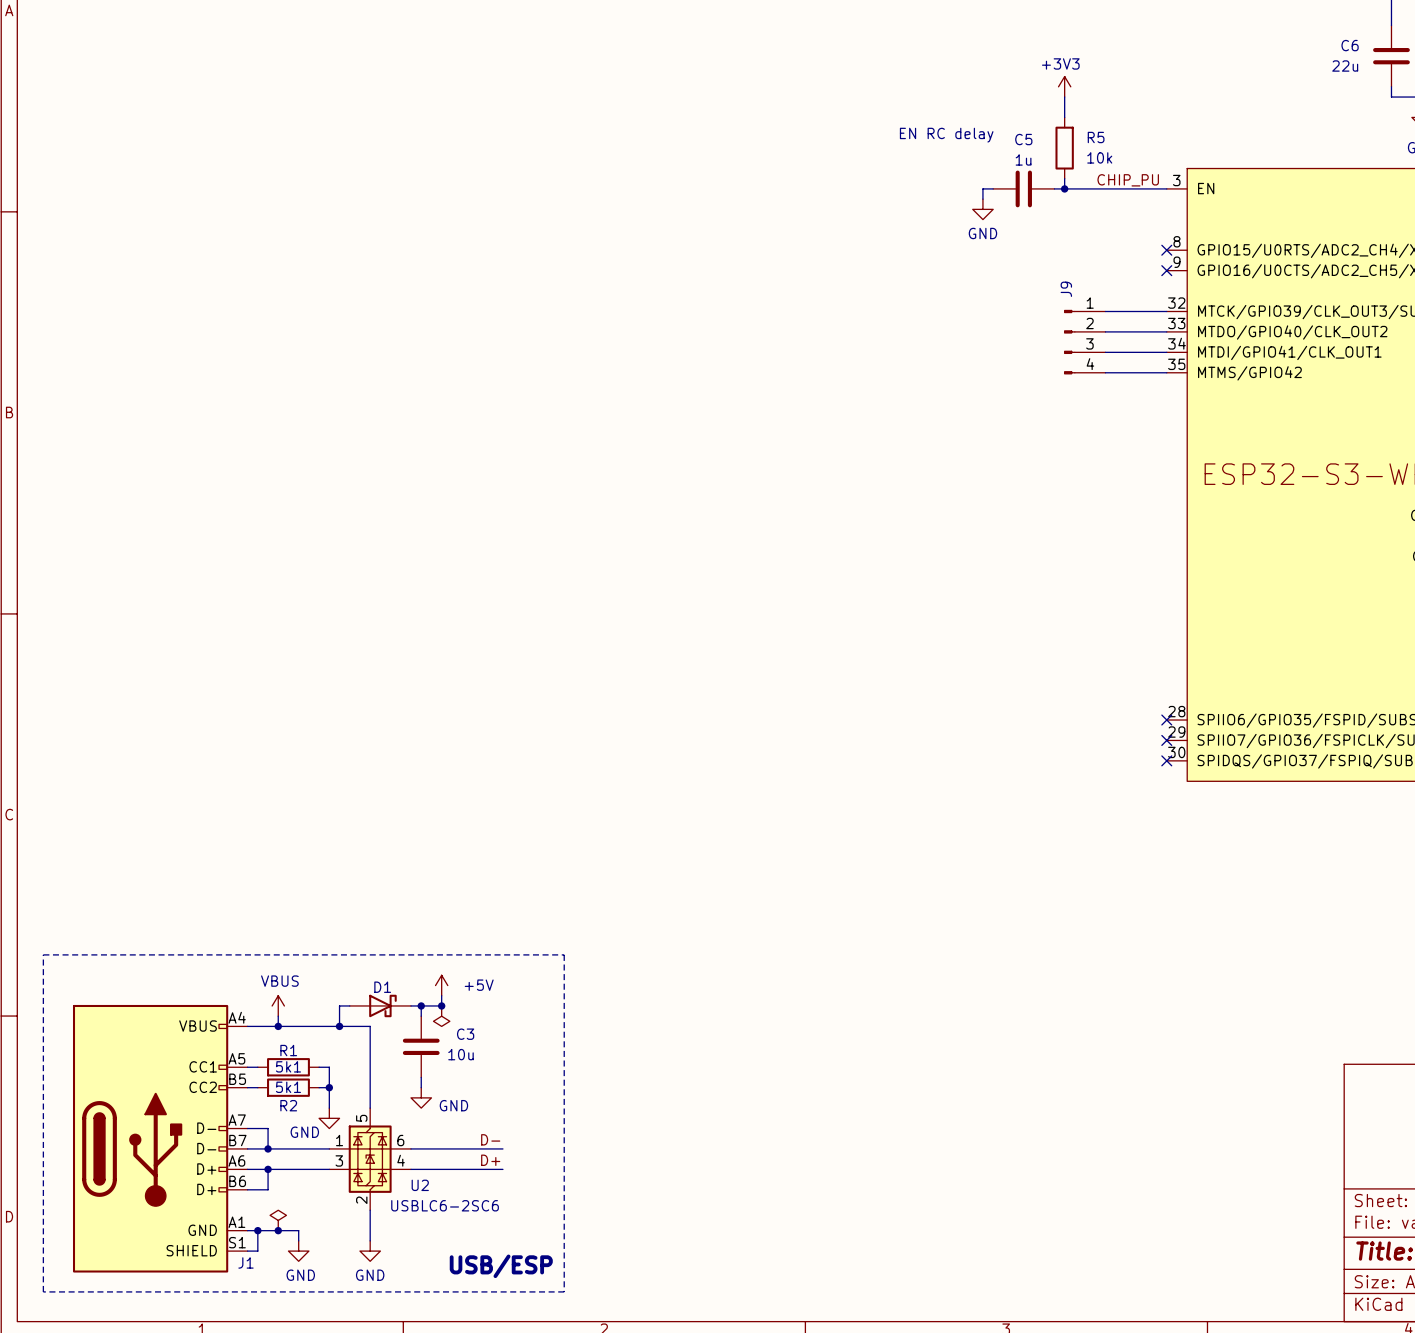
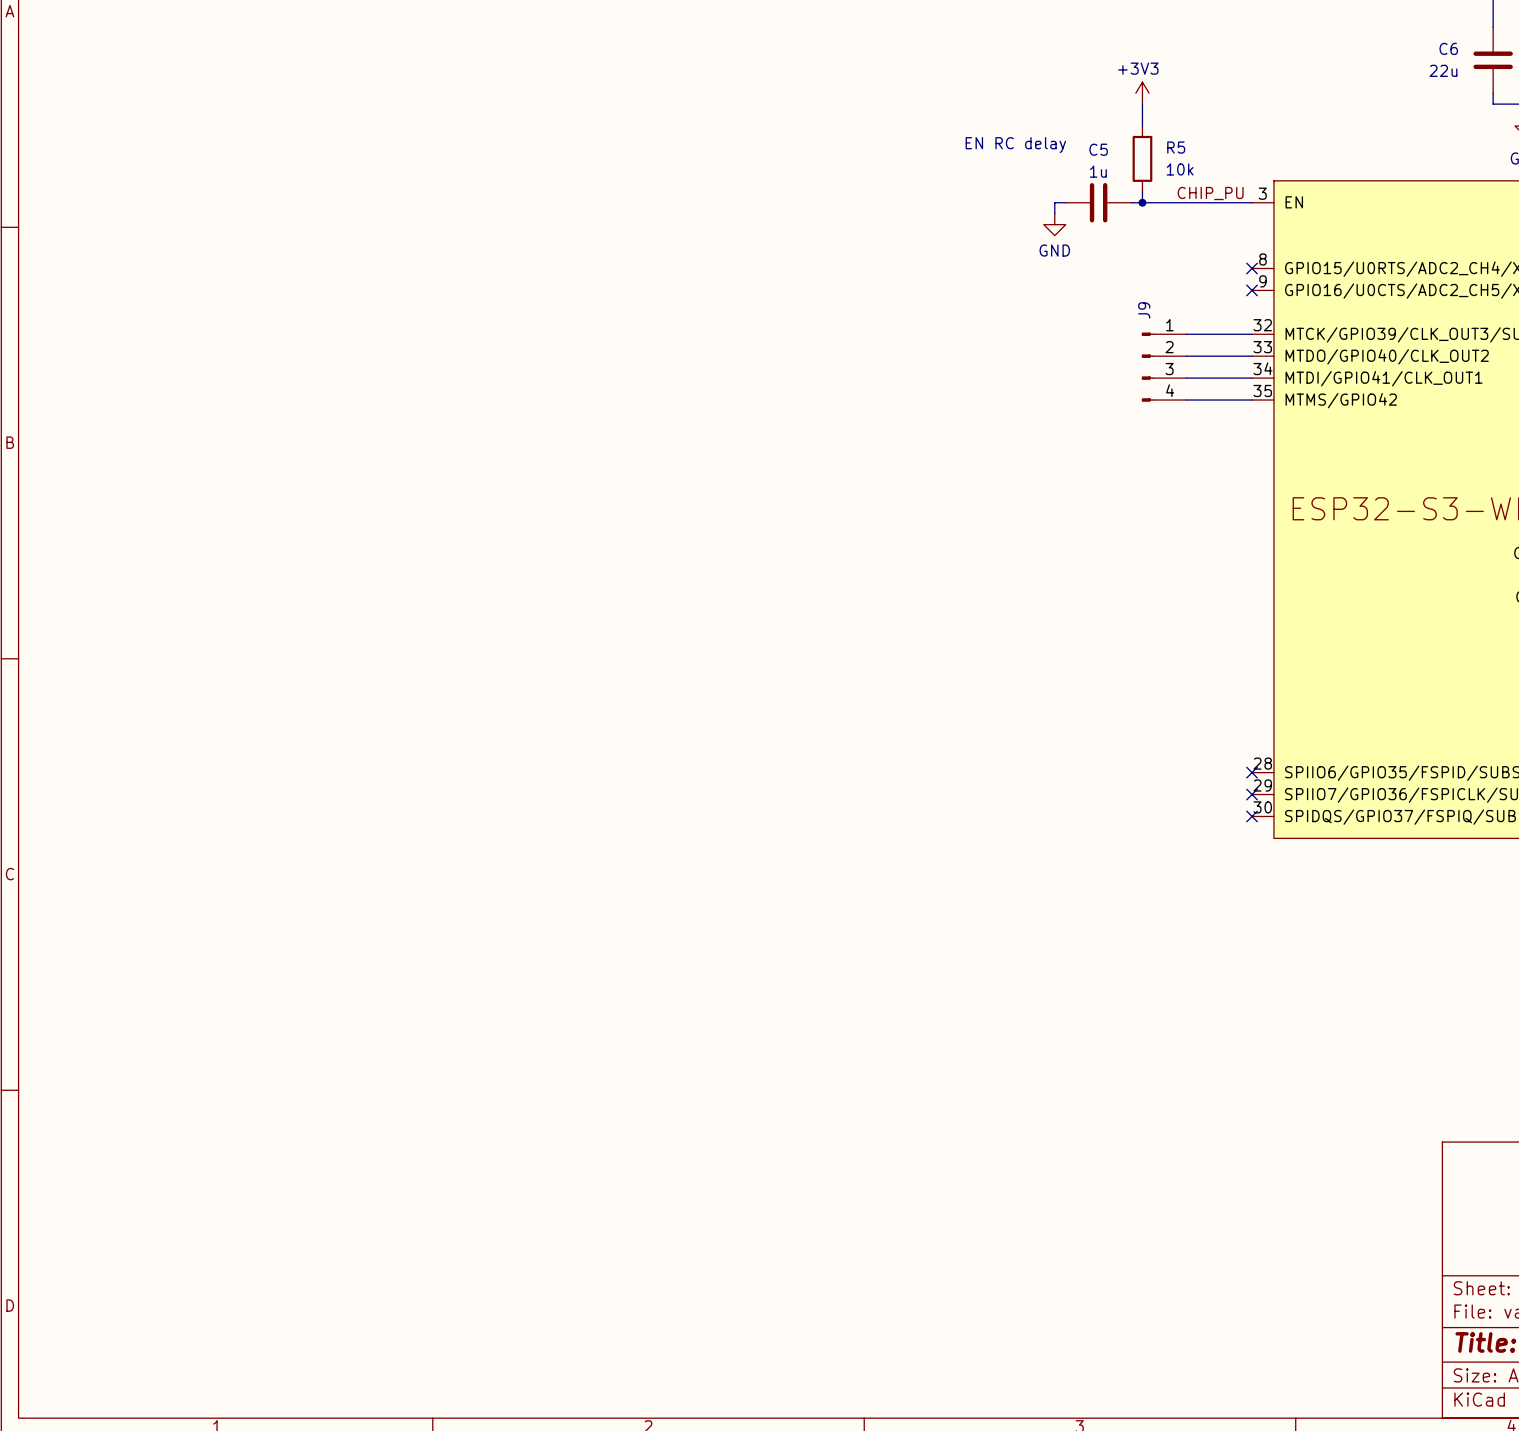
line: (43, 954) (564, 954) (564, 1291) (43, 1291) (43, 954) -> none
power symbol: +5V (441, 985) -> none
wire: (441, 995) (441, 1005) (411, 1005) -> none
power symbol: VBUS (278, 1005) -> none
wire: (349, 1005) (339, 1005) (339, 1026) -> none
D1: (380, 1005) -> none
wire: (421, 1005) (421, 1016) -> none
junction: (421, 1005) -> none
junction: (441, 1005) -> none
wire: (278, 1016) (278, 1026) -> none
power symbol: (441, 1016) -> none
wire: (247, 1026) (370, 1026) (370, 1108) -> none
junction: (278, 1026) -> none
junction: (339, 1026) -> none
C3: 10u (421, 1046) -> none
wire: (247, 1067) (257, 1067) -> none
R1: 5k1 (288, 1067) -> none
wire: (319, 1067) (329, 1067) (329, 1108) -> none
wire: (421, 1077) (421, 1087) -> none
wire: (247, 1087) (257, 1087) -> none
R2: 5k1 (288, 1087) -> none
wire: (319, 1087) (329, 1087) -> none
junction: (329, 1087) -> none
power symbol: GND (421, 1097) -> none
power symbol: GND (329, 1118) -> none
wire: (247, 1128) (268, 1128) (268, 1148) -> none
J1: (160, 1138) -> none
label: D- (490, 1139) -> none
wire: (247, 1148) (329, 1148) -> none
junction: (268, 1148) -> none
wire: (411, 1148) (502, 1148) -> none
U2: USBLC6-2SC6 (370, 1159) -> none
label: D+ (490, 1160) -> none
wire: (247, 1169) (329, 1169) -> none
wire: (268, 1169) (268, 1189) (247, 1189) -> none
junction: (268, 1169) -> none
wire: (411, 1169) (502, 1169) -> none
wire: (370, 1210) (370, 1240) -> none
power symbol: (278, 1220) -> none
wire: (247, 1230) (298, 1230) (298, 1240) -> none
wire: (257, 1230) (257, 1251) (247, 1251) -> none
junction: (257, 1230) -> none
junction: (278, 1230) -> none
power symbol: GND (298, 1251) -> none
power symbol: GND (370, 1251) -> none
text: USB/ESP (501, 1266) -> none

